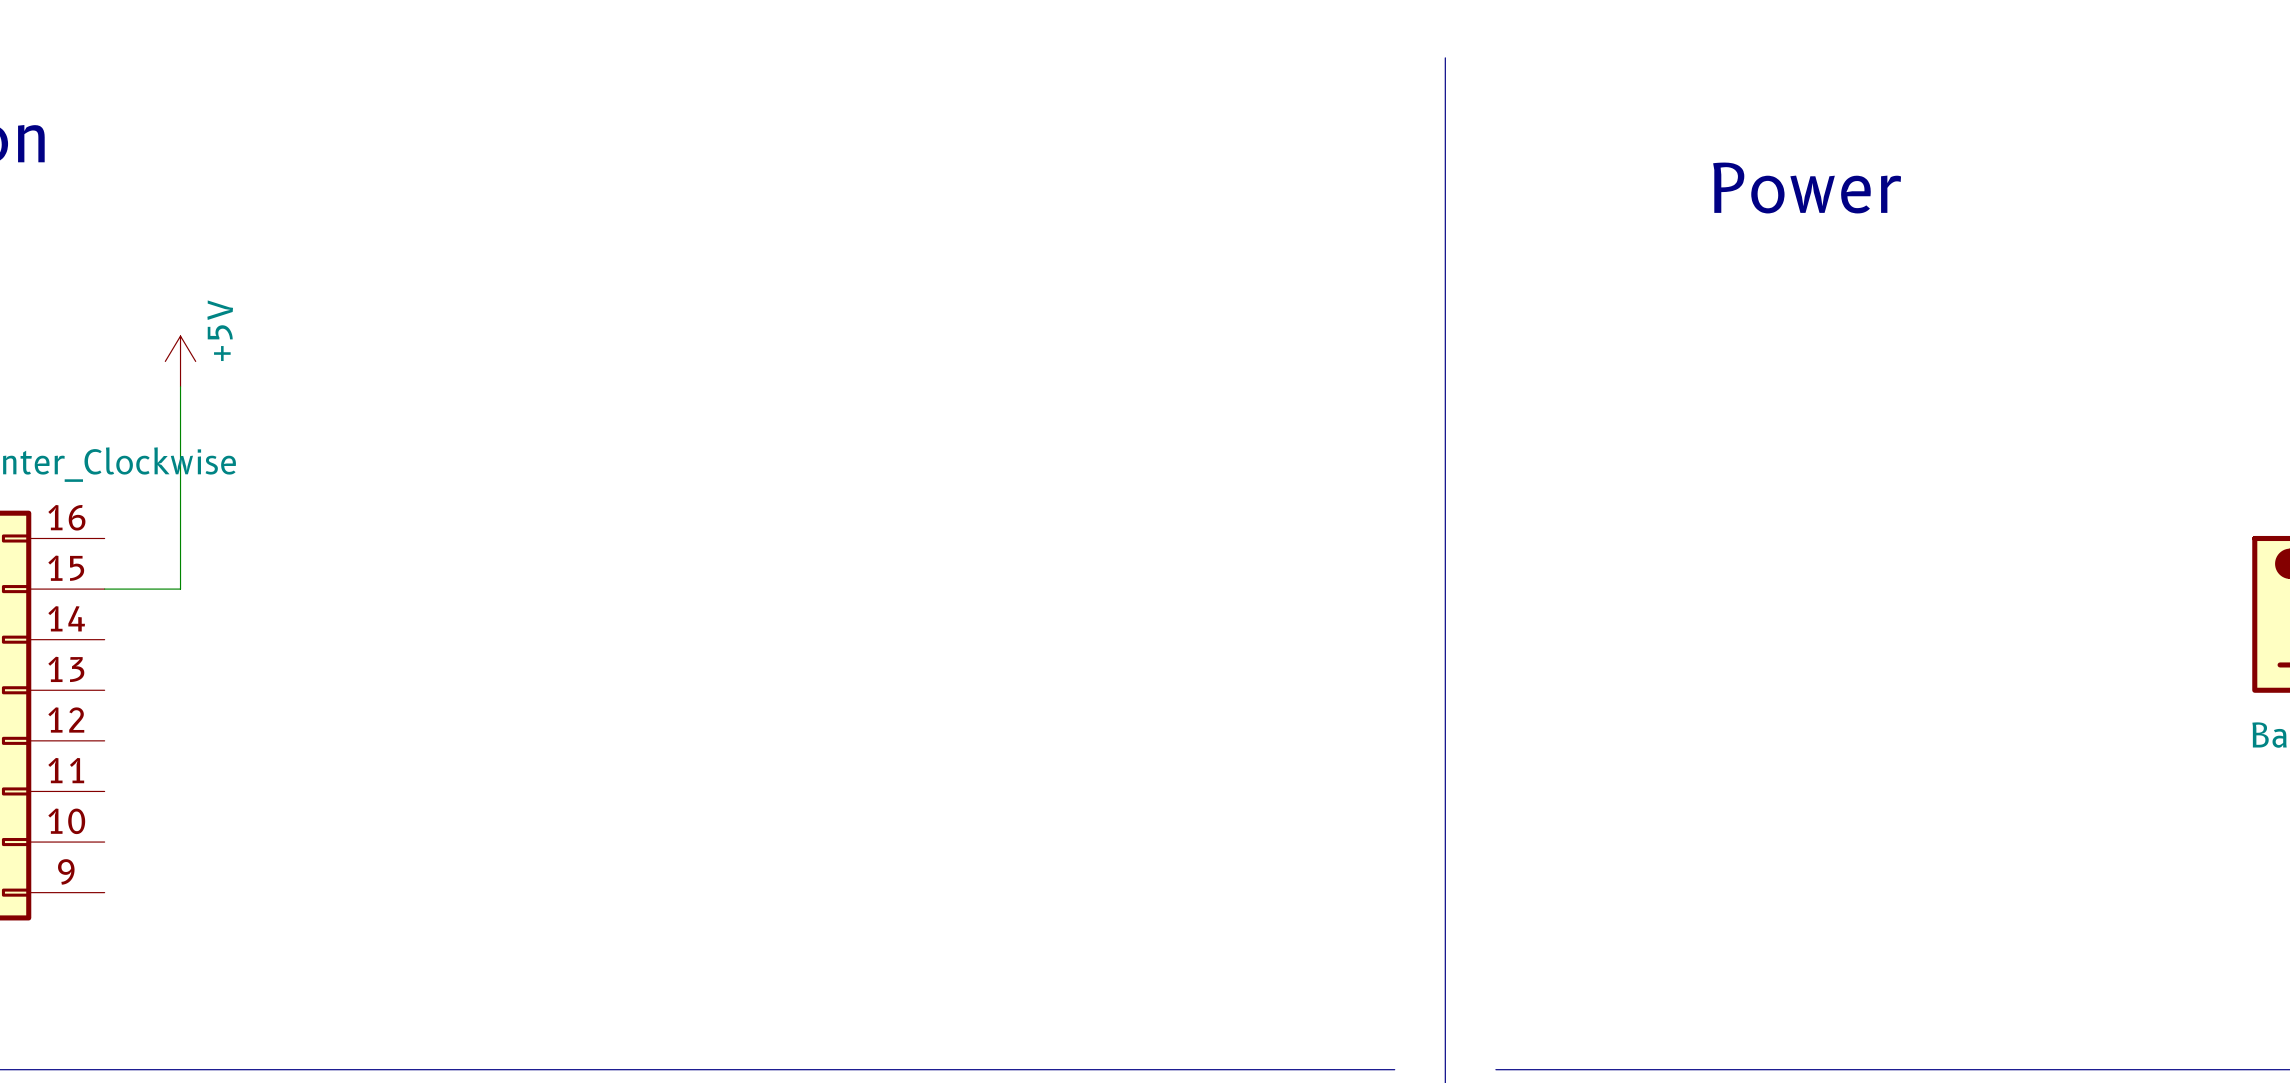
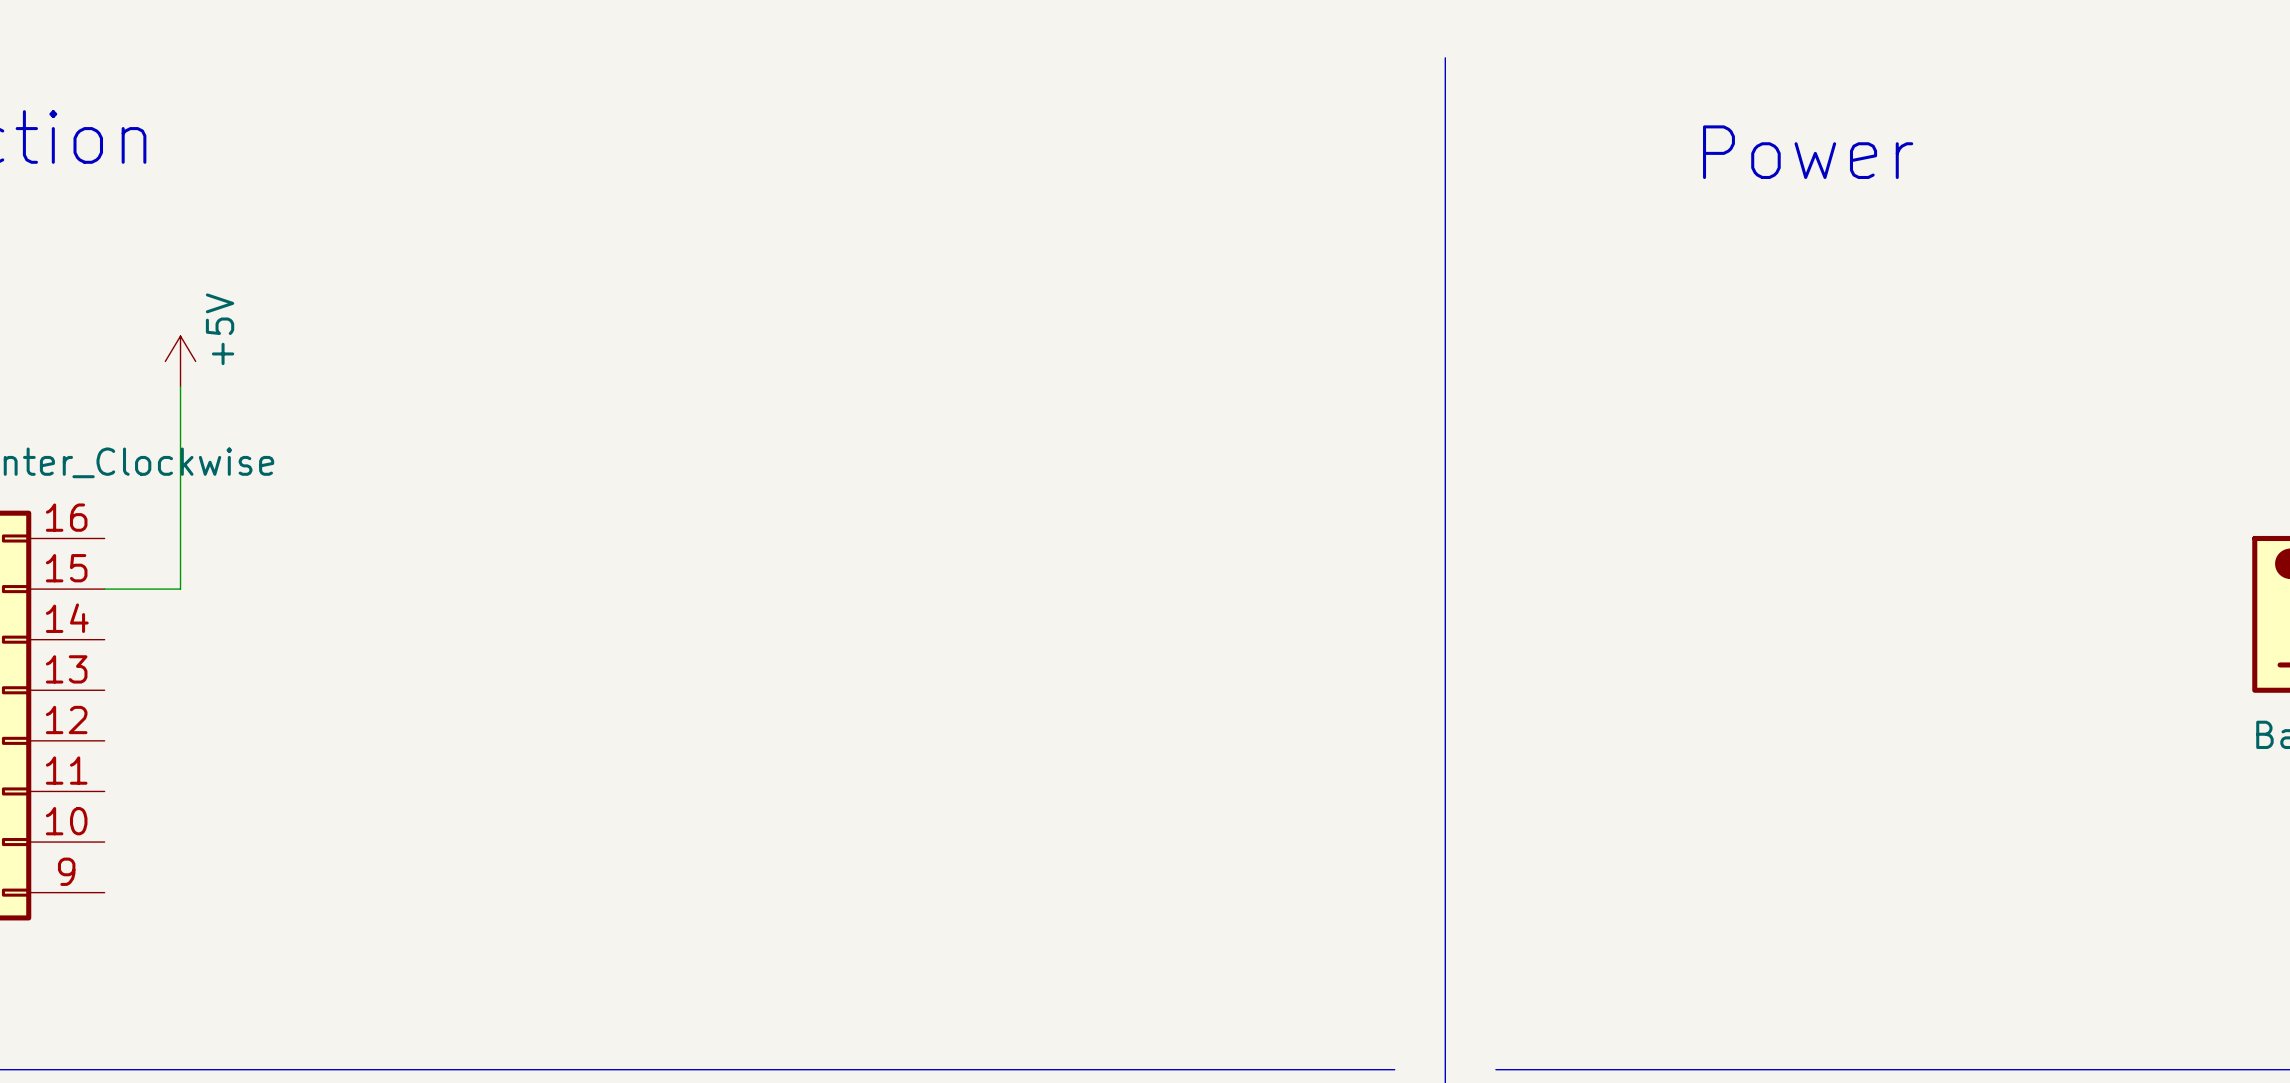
text position: Power (1807, 188) -> Power (1808, 152)

